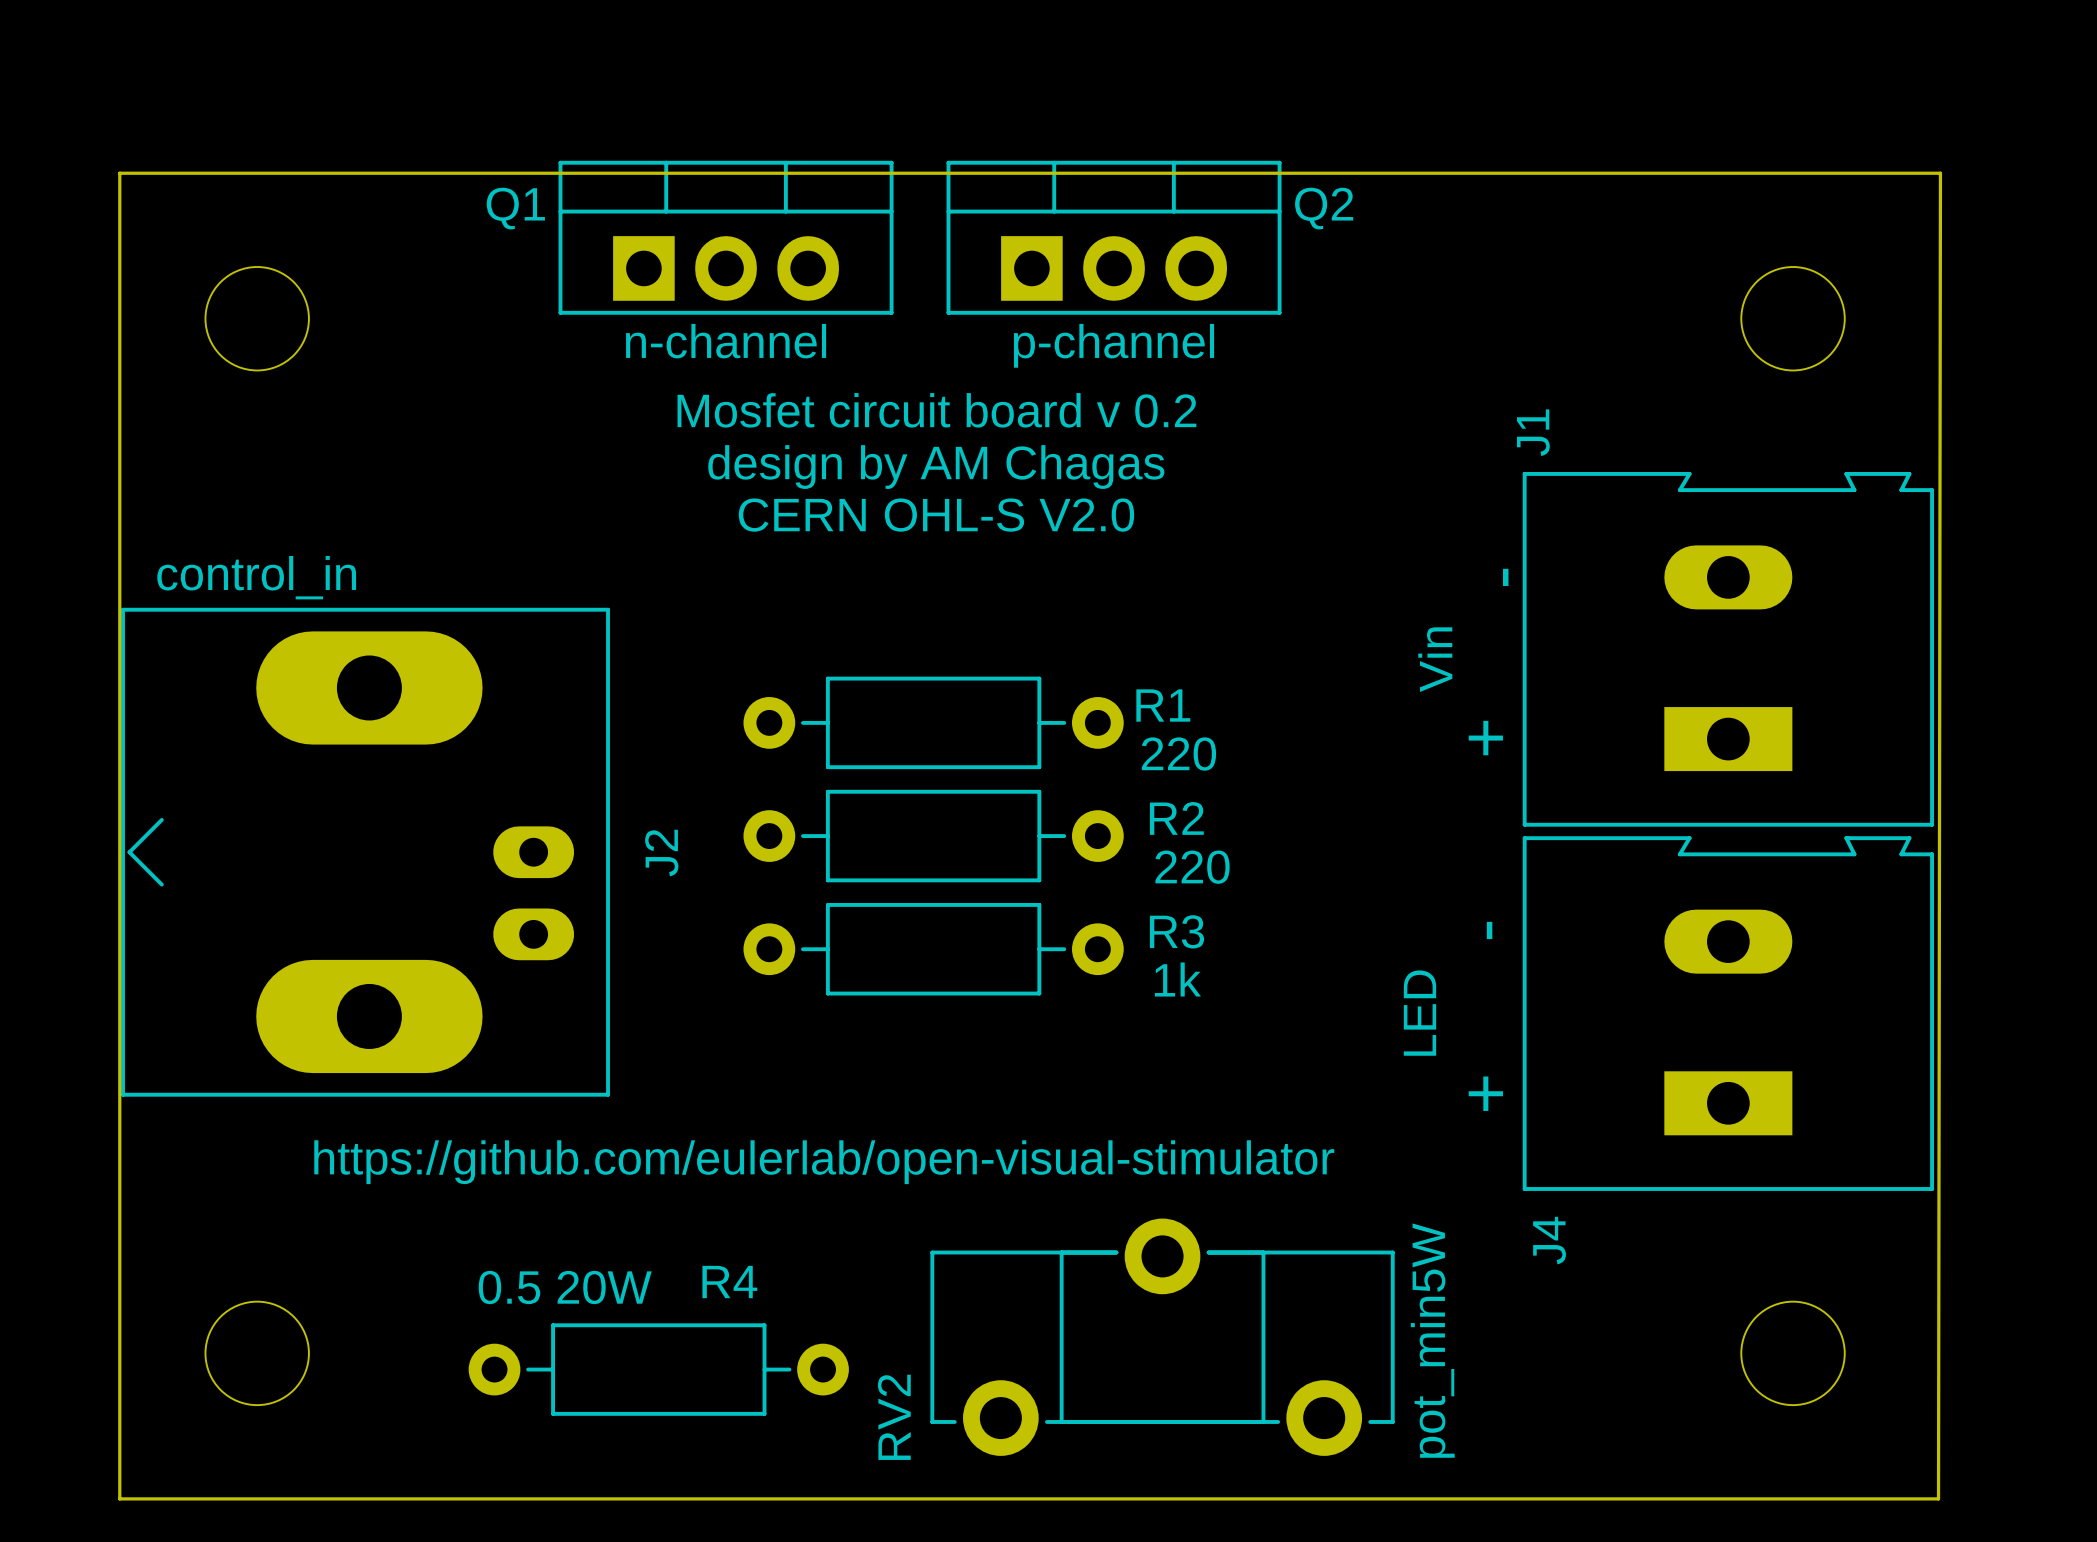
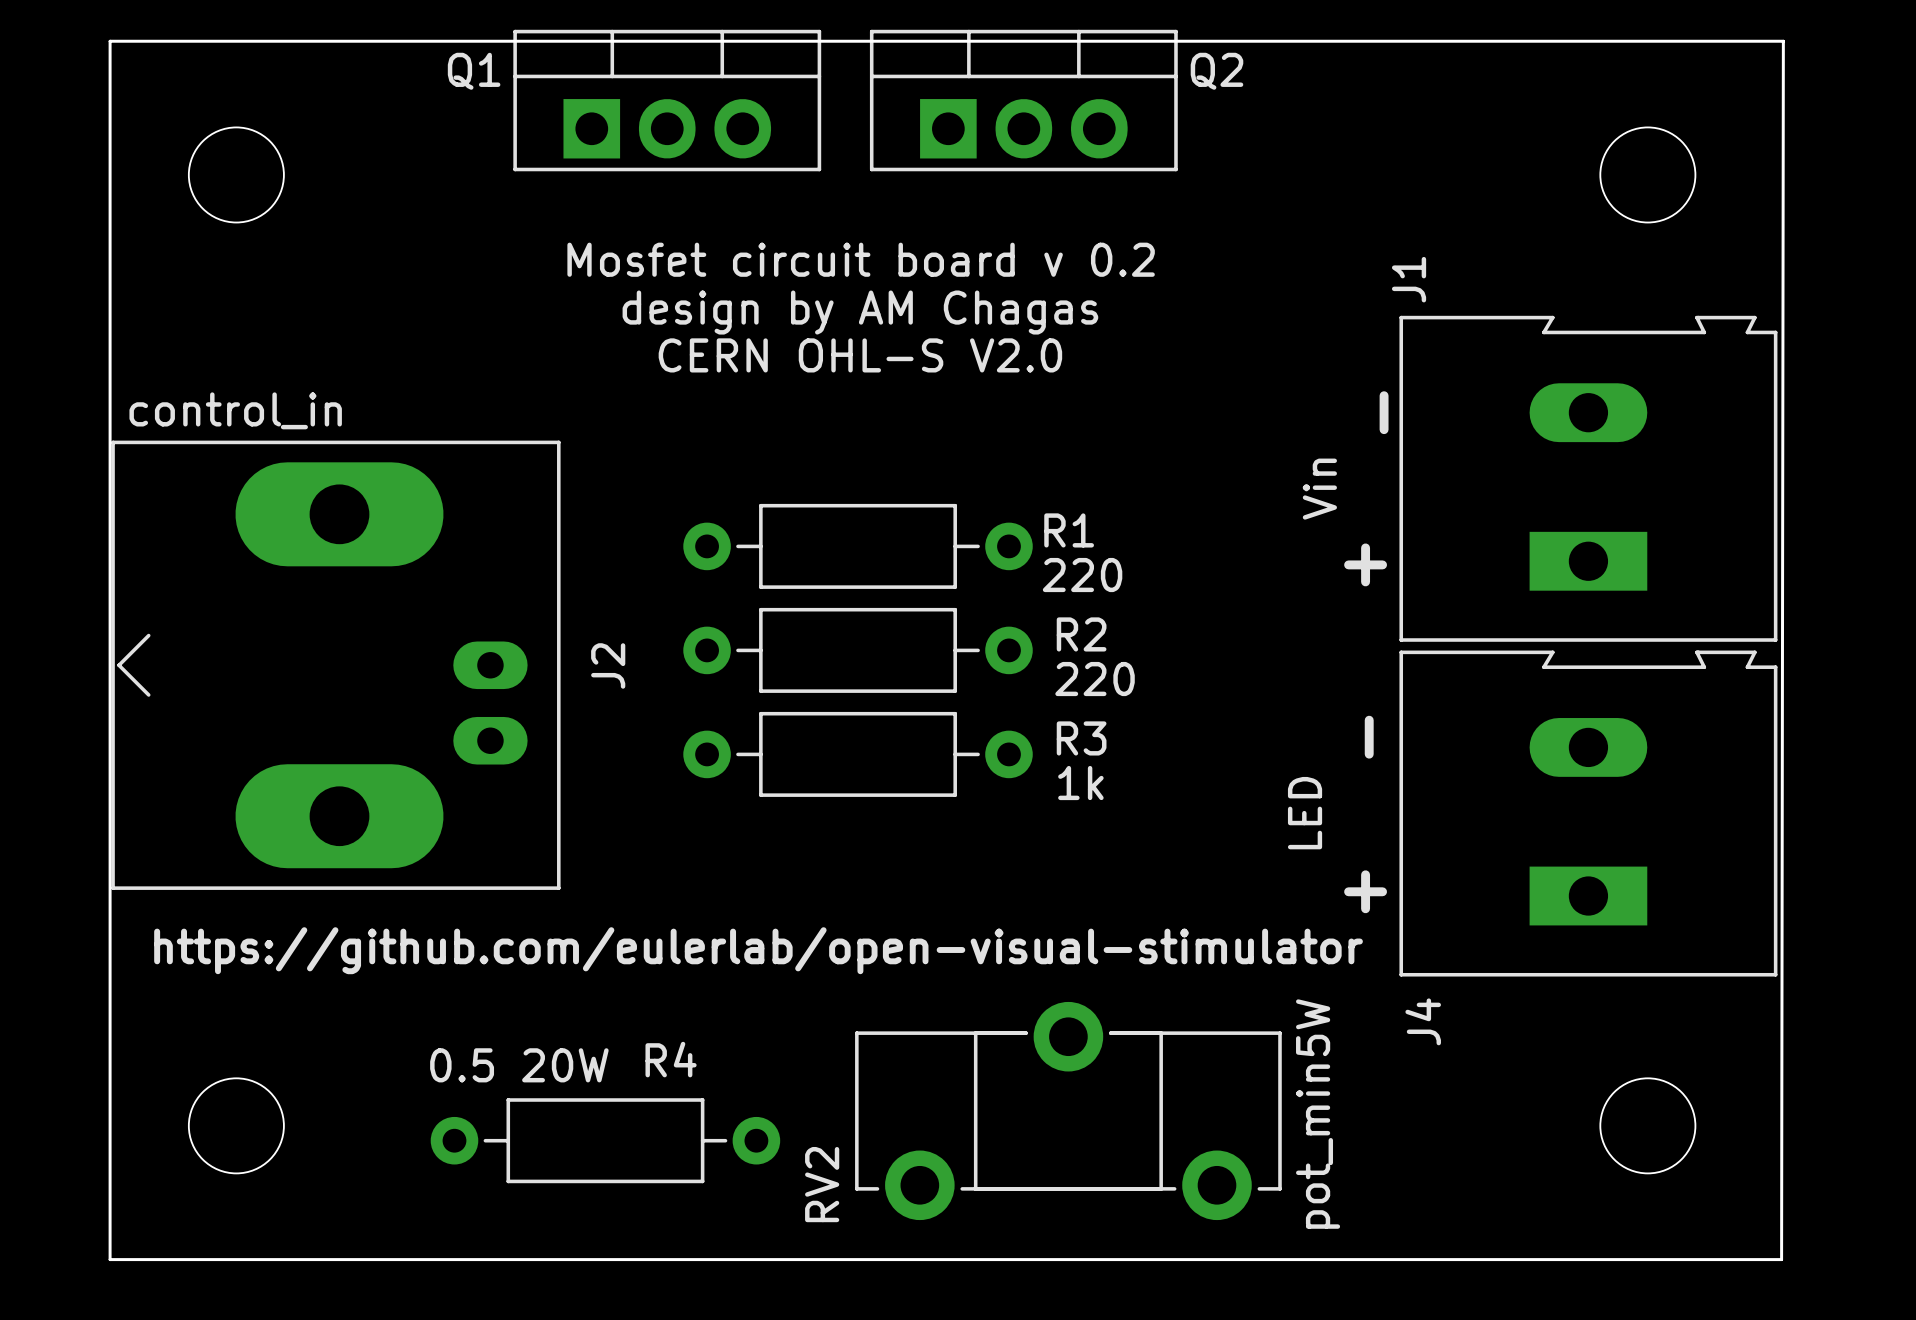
text: n-channel (726, 341) -> none
text: p-channel (1113, 345) -> none

